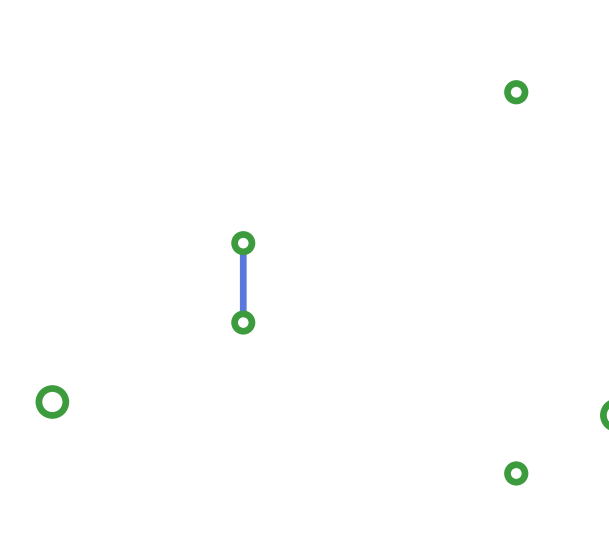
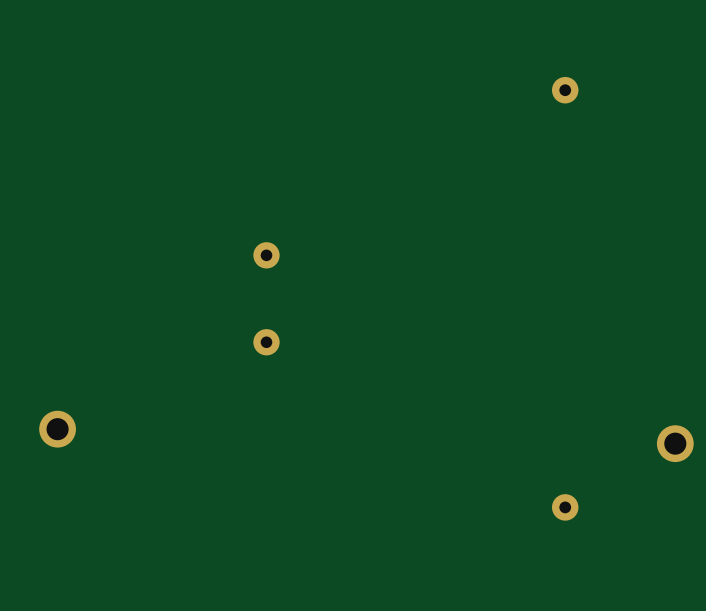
track: (243, 243) (243, 322) -> none

